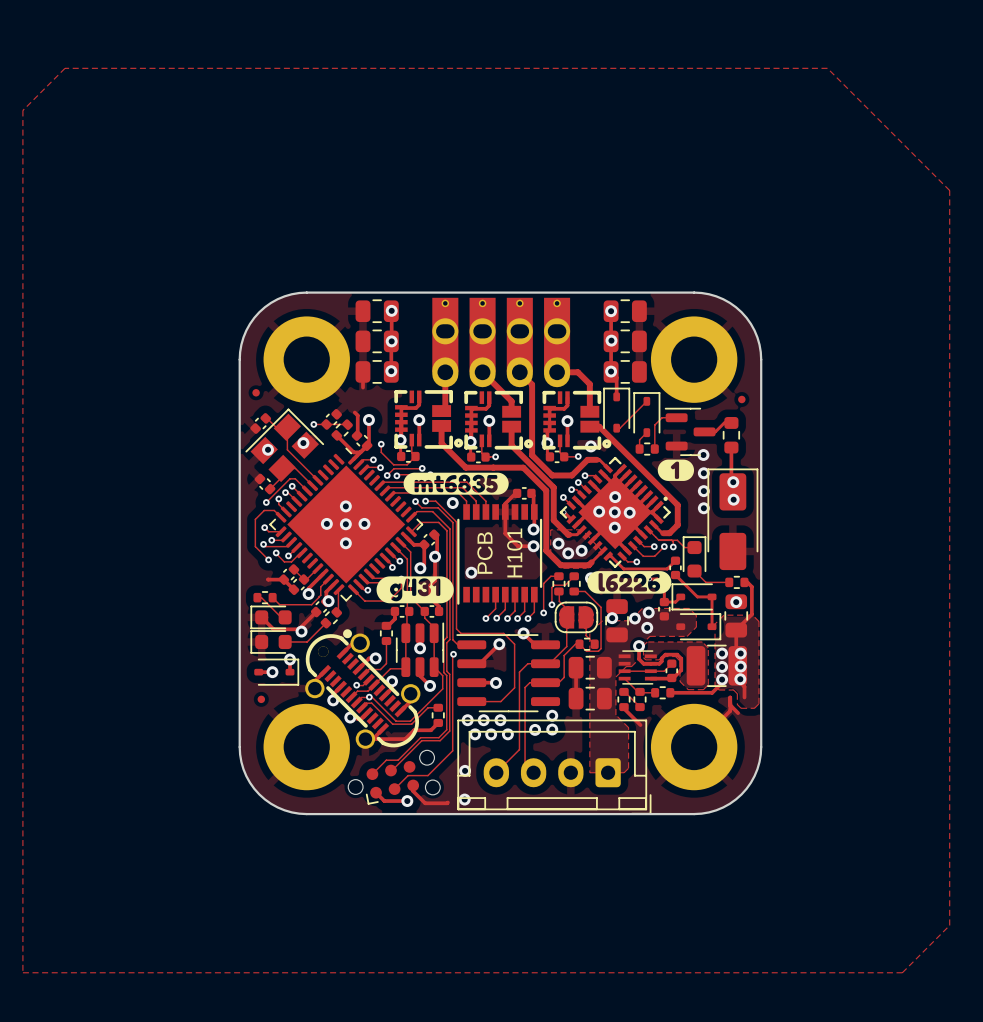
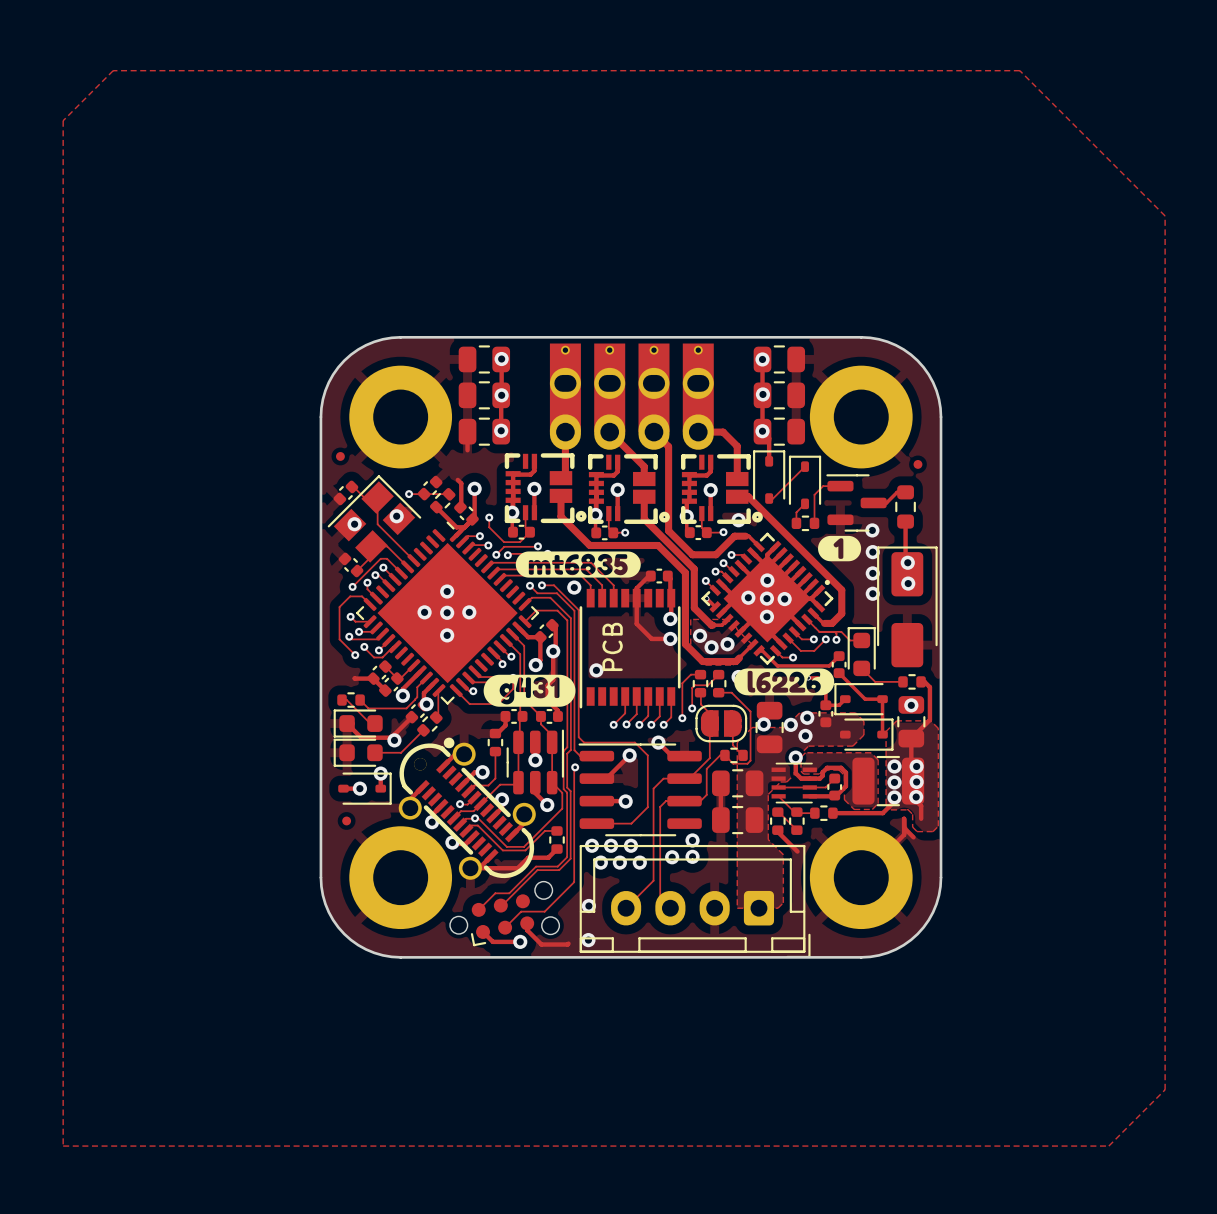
H101 name: H101 (514, 552) -> none

